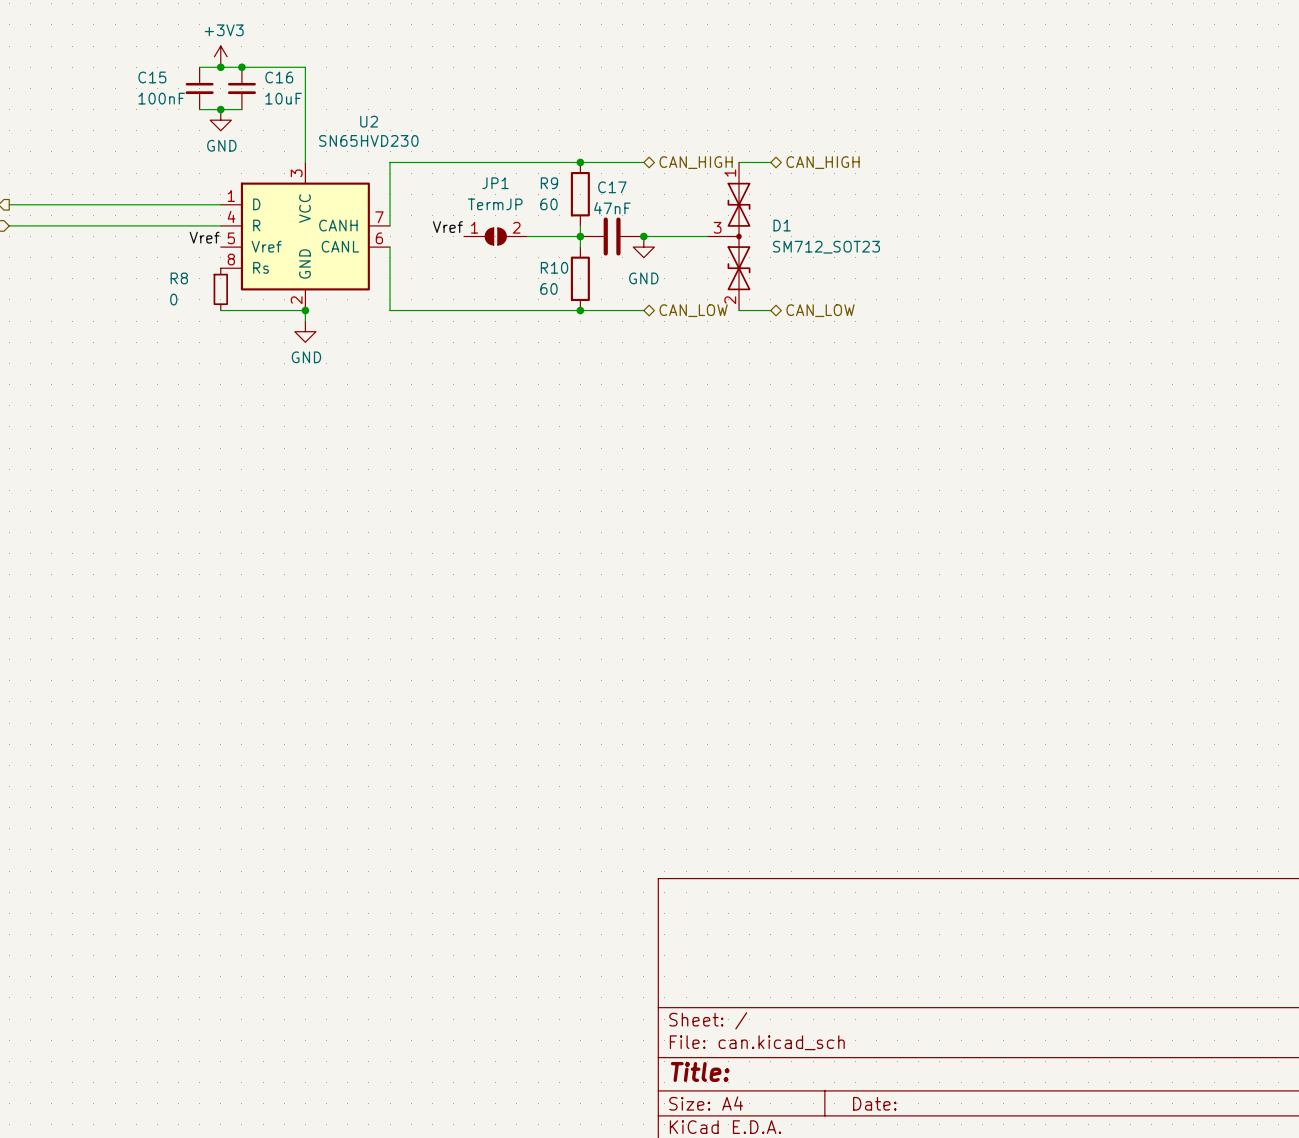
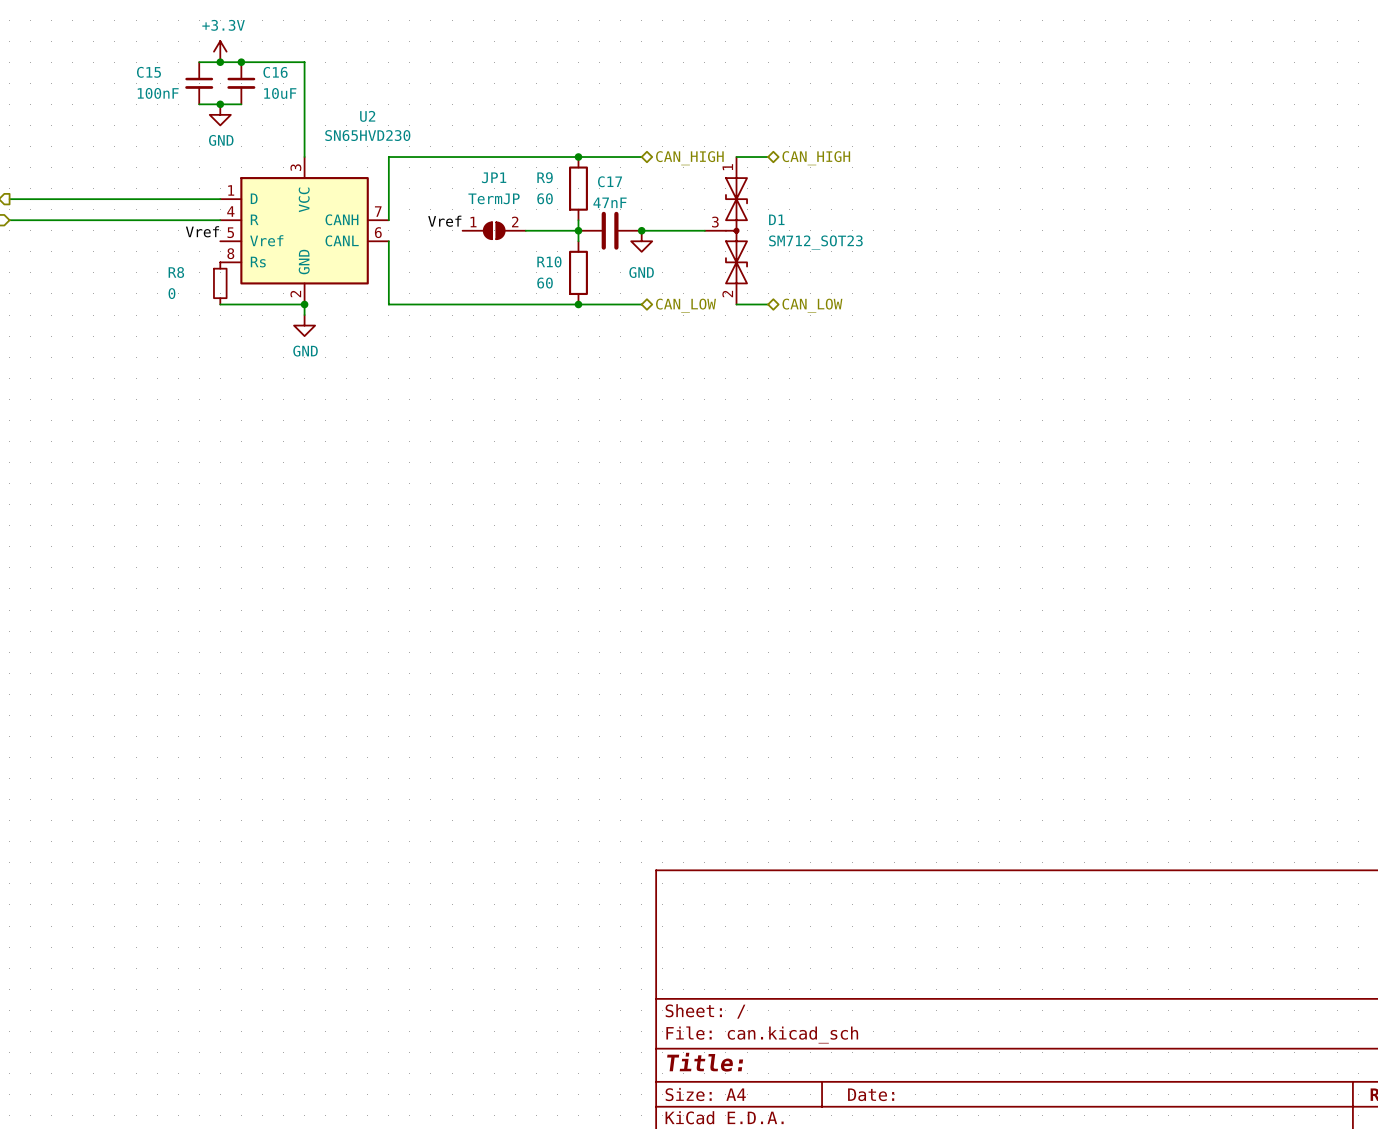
power symbol: +3V3 (220, 56) -> +3.3V (220, 51)

